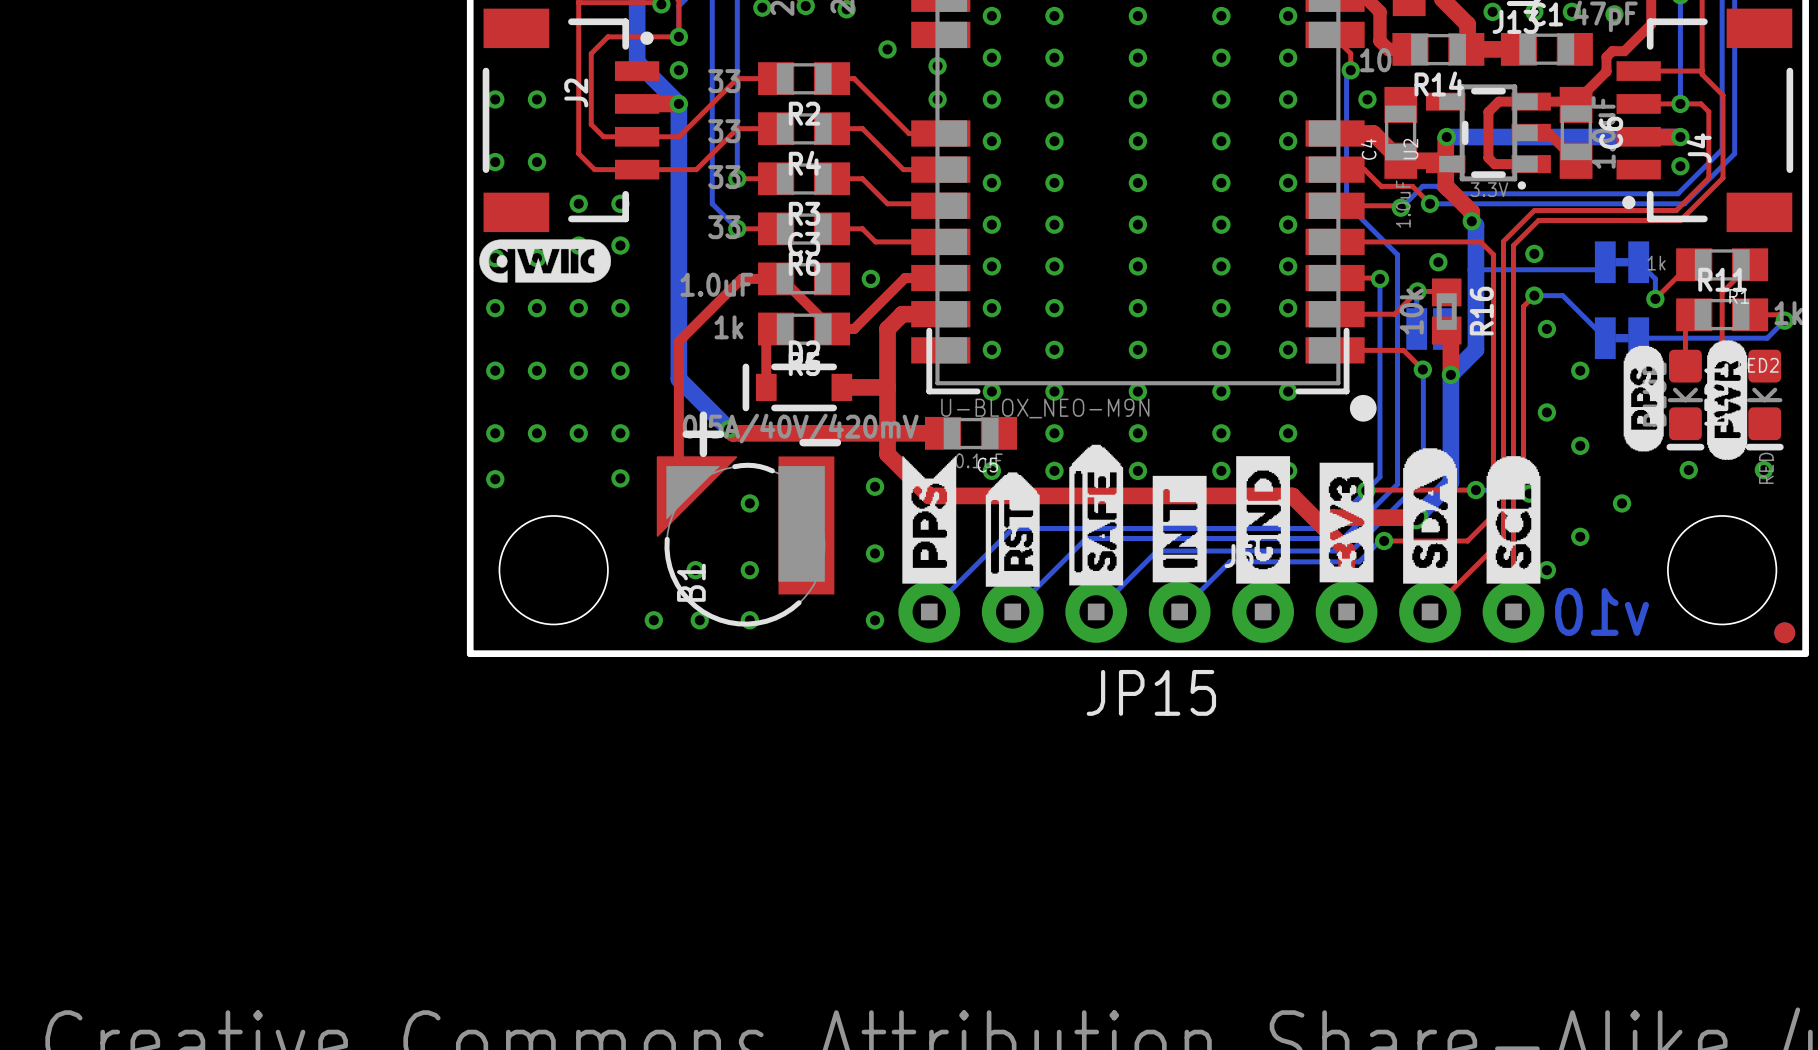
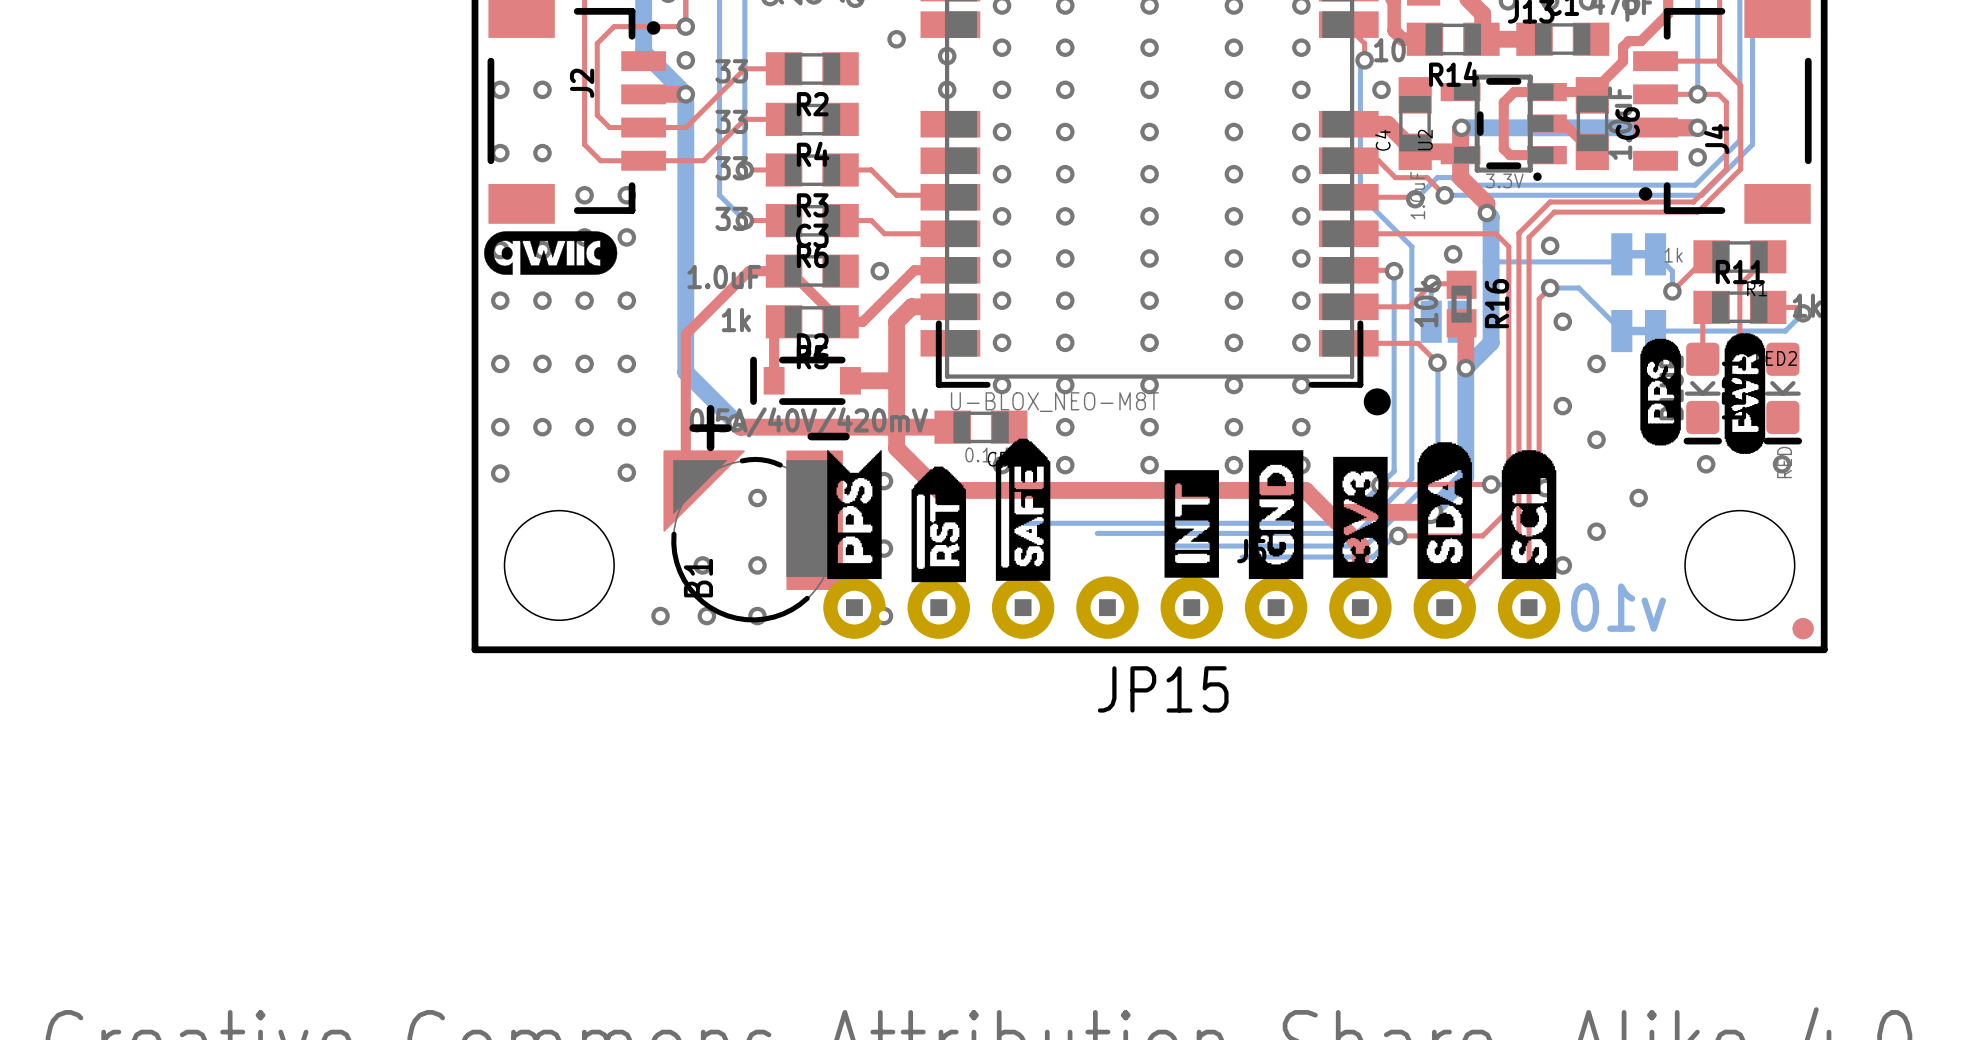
top track: (832, 78) (854, 78) (909, 133) (940, 133) -> none
top track: (832, 128) (862, 128) (903, 169) (940, 169) -> none
part value: U-BLOX_NEO-M9N (1045, 408) -> U-BLOX_NEO-M8T (1054, 402)
drawing position: (1096, 515) -> (1023, 509)
drawing position: (929, 519) -> (854, 514)
bottom track: (1012, 528) (929, 611) -> none
drawing position: (1012, 529) -> (938, 524)
bottom track: (1086, 538) (1012, 611) -> none
bottom track: (1157, 551) (1096, 611) -> none
bottom track: (1229, 561) (1179, 611) -> none
JP15 footprint: [898, 581, 1211, 643] -> [823, 576, 1223, 639]

